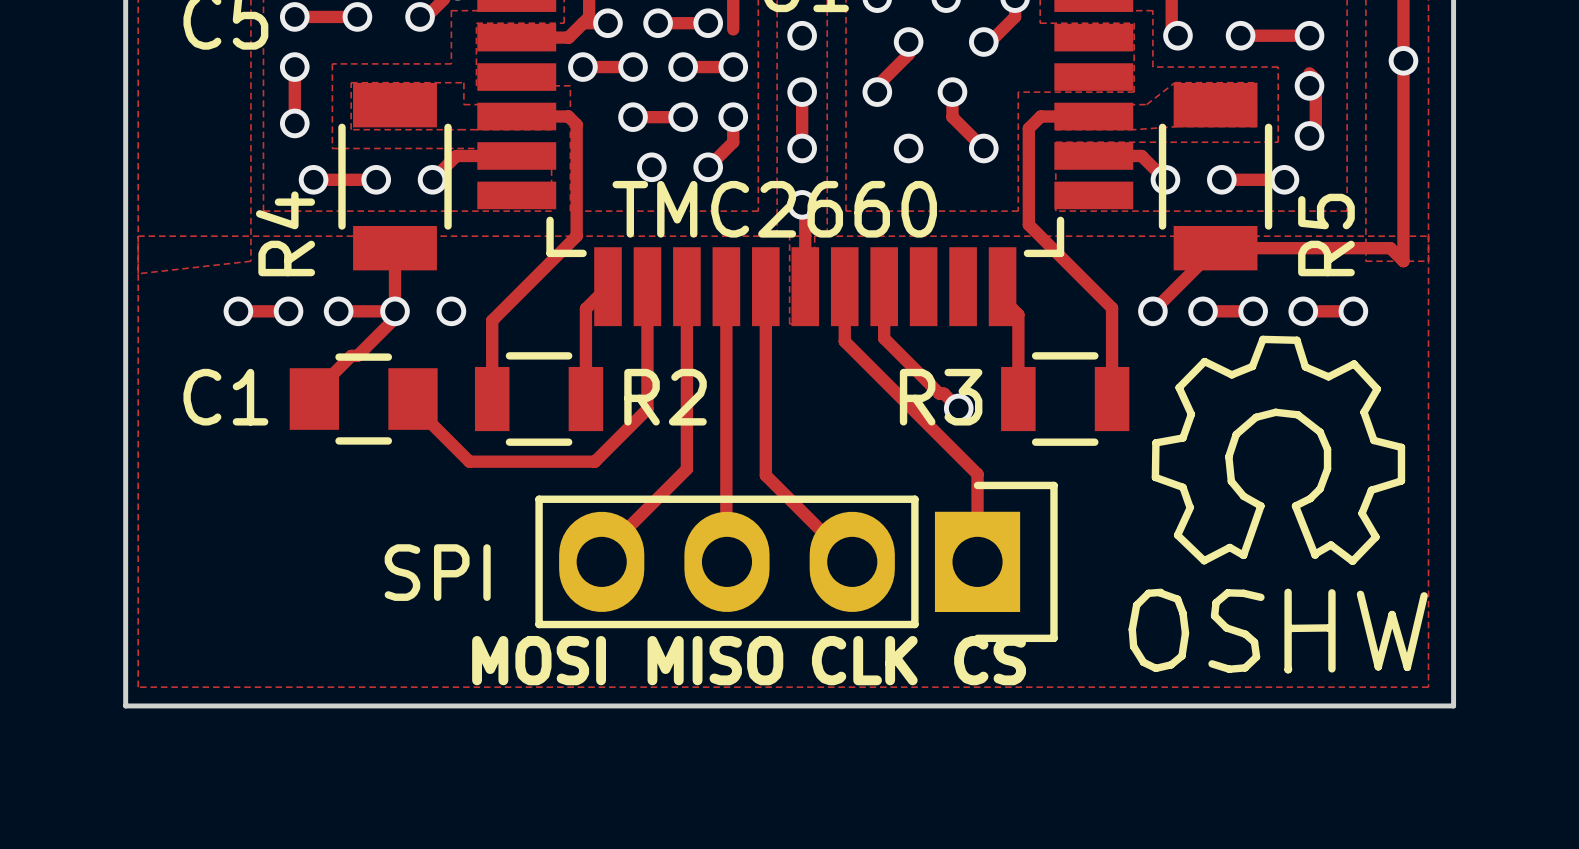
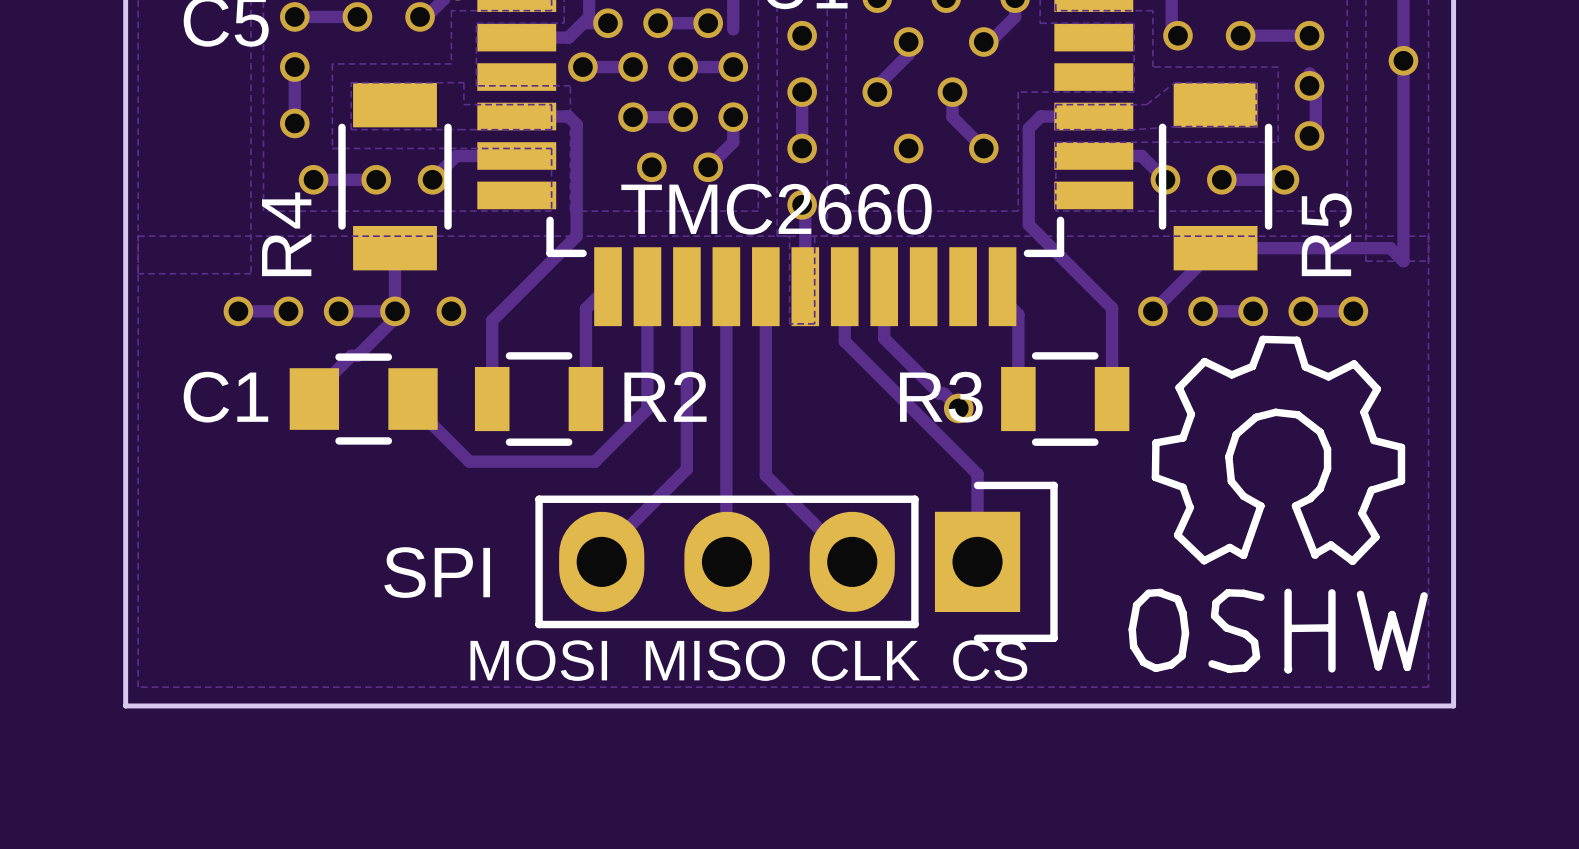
zone outline: (250, 261) (138, 273) -> (250, 261) (250, 273) (138, 273)

